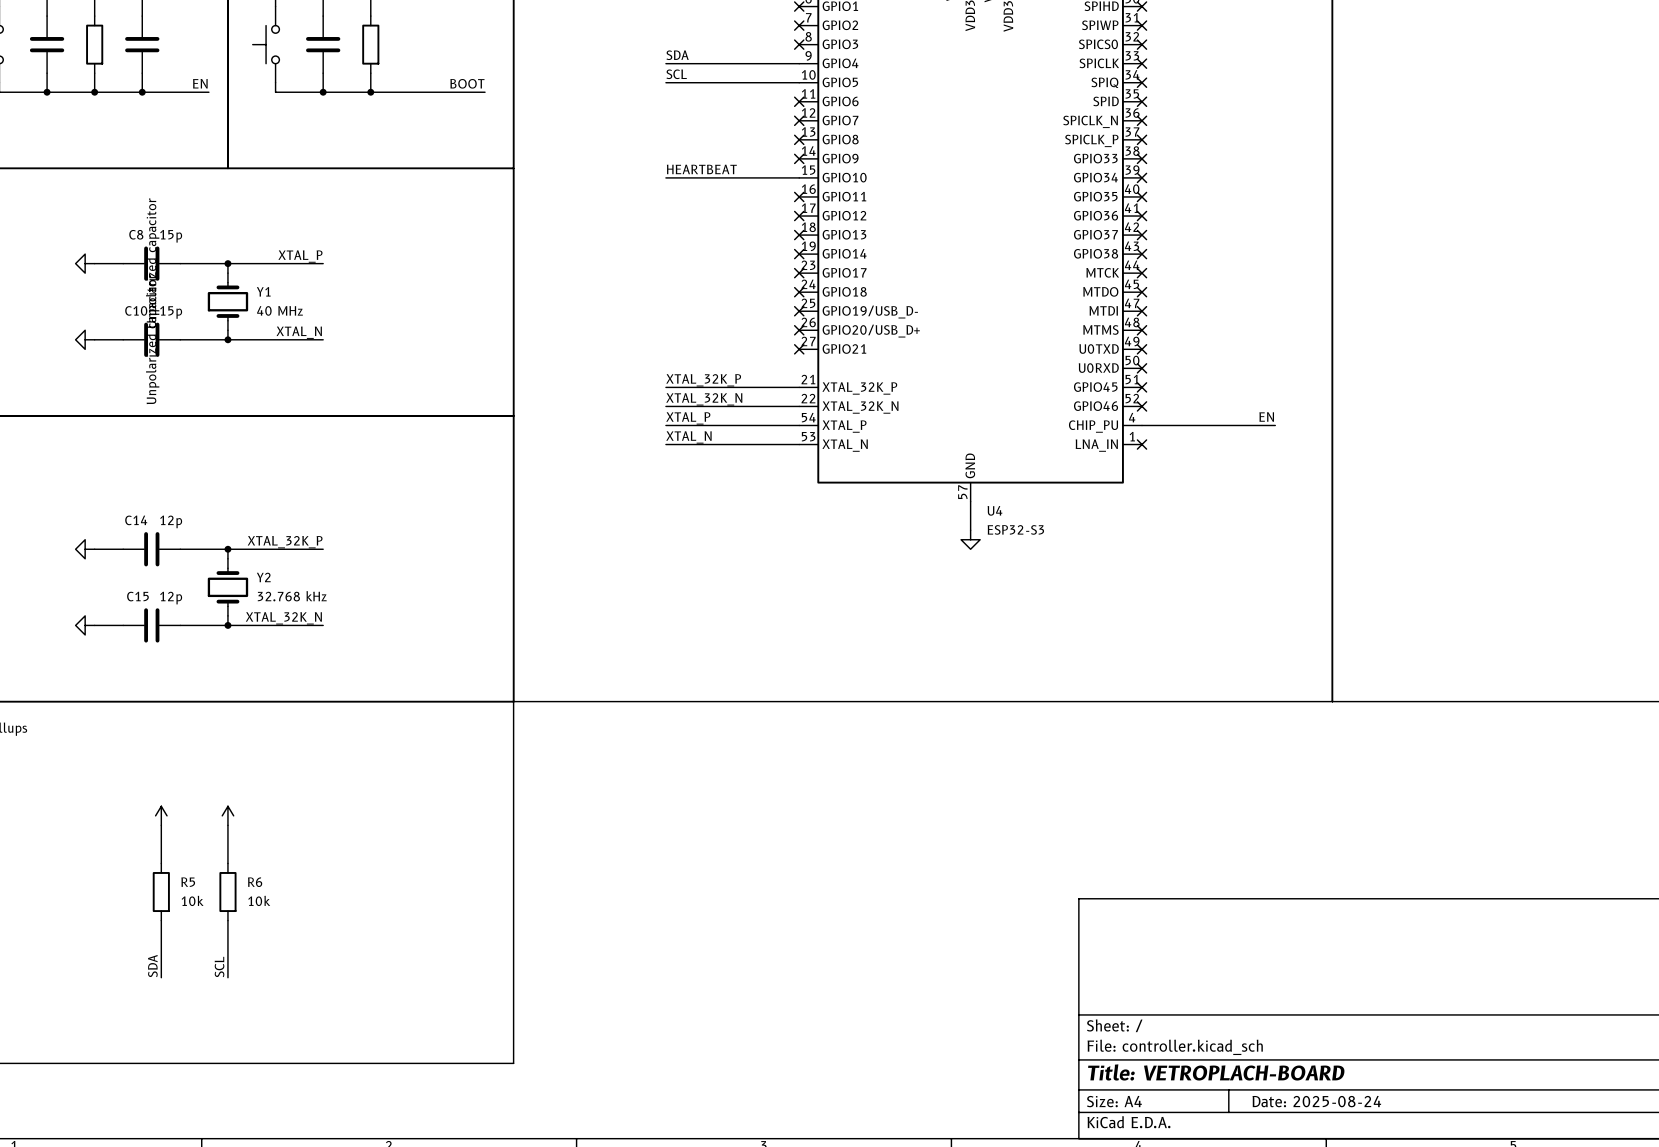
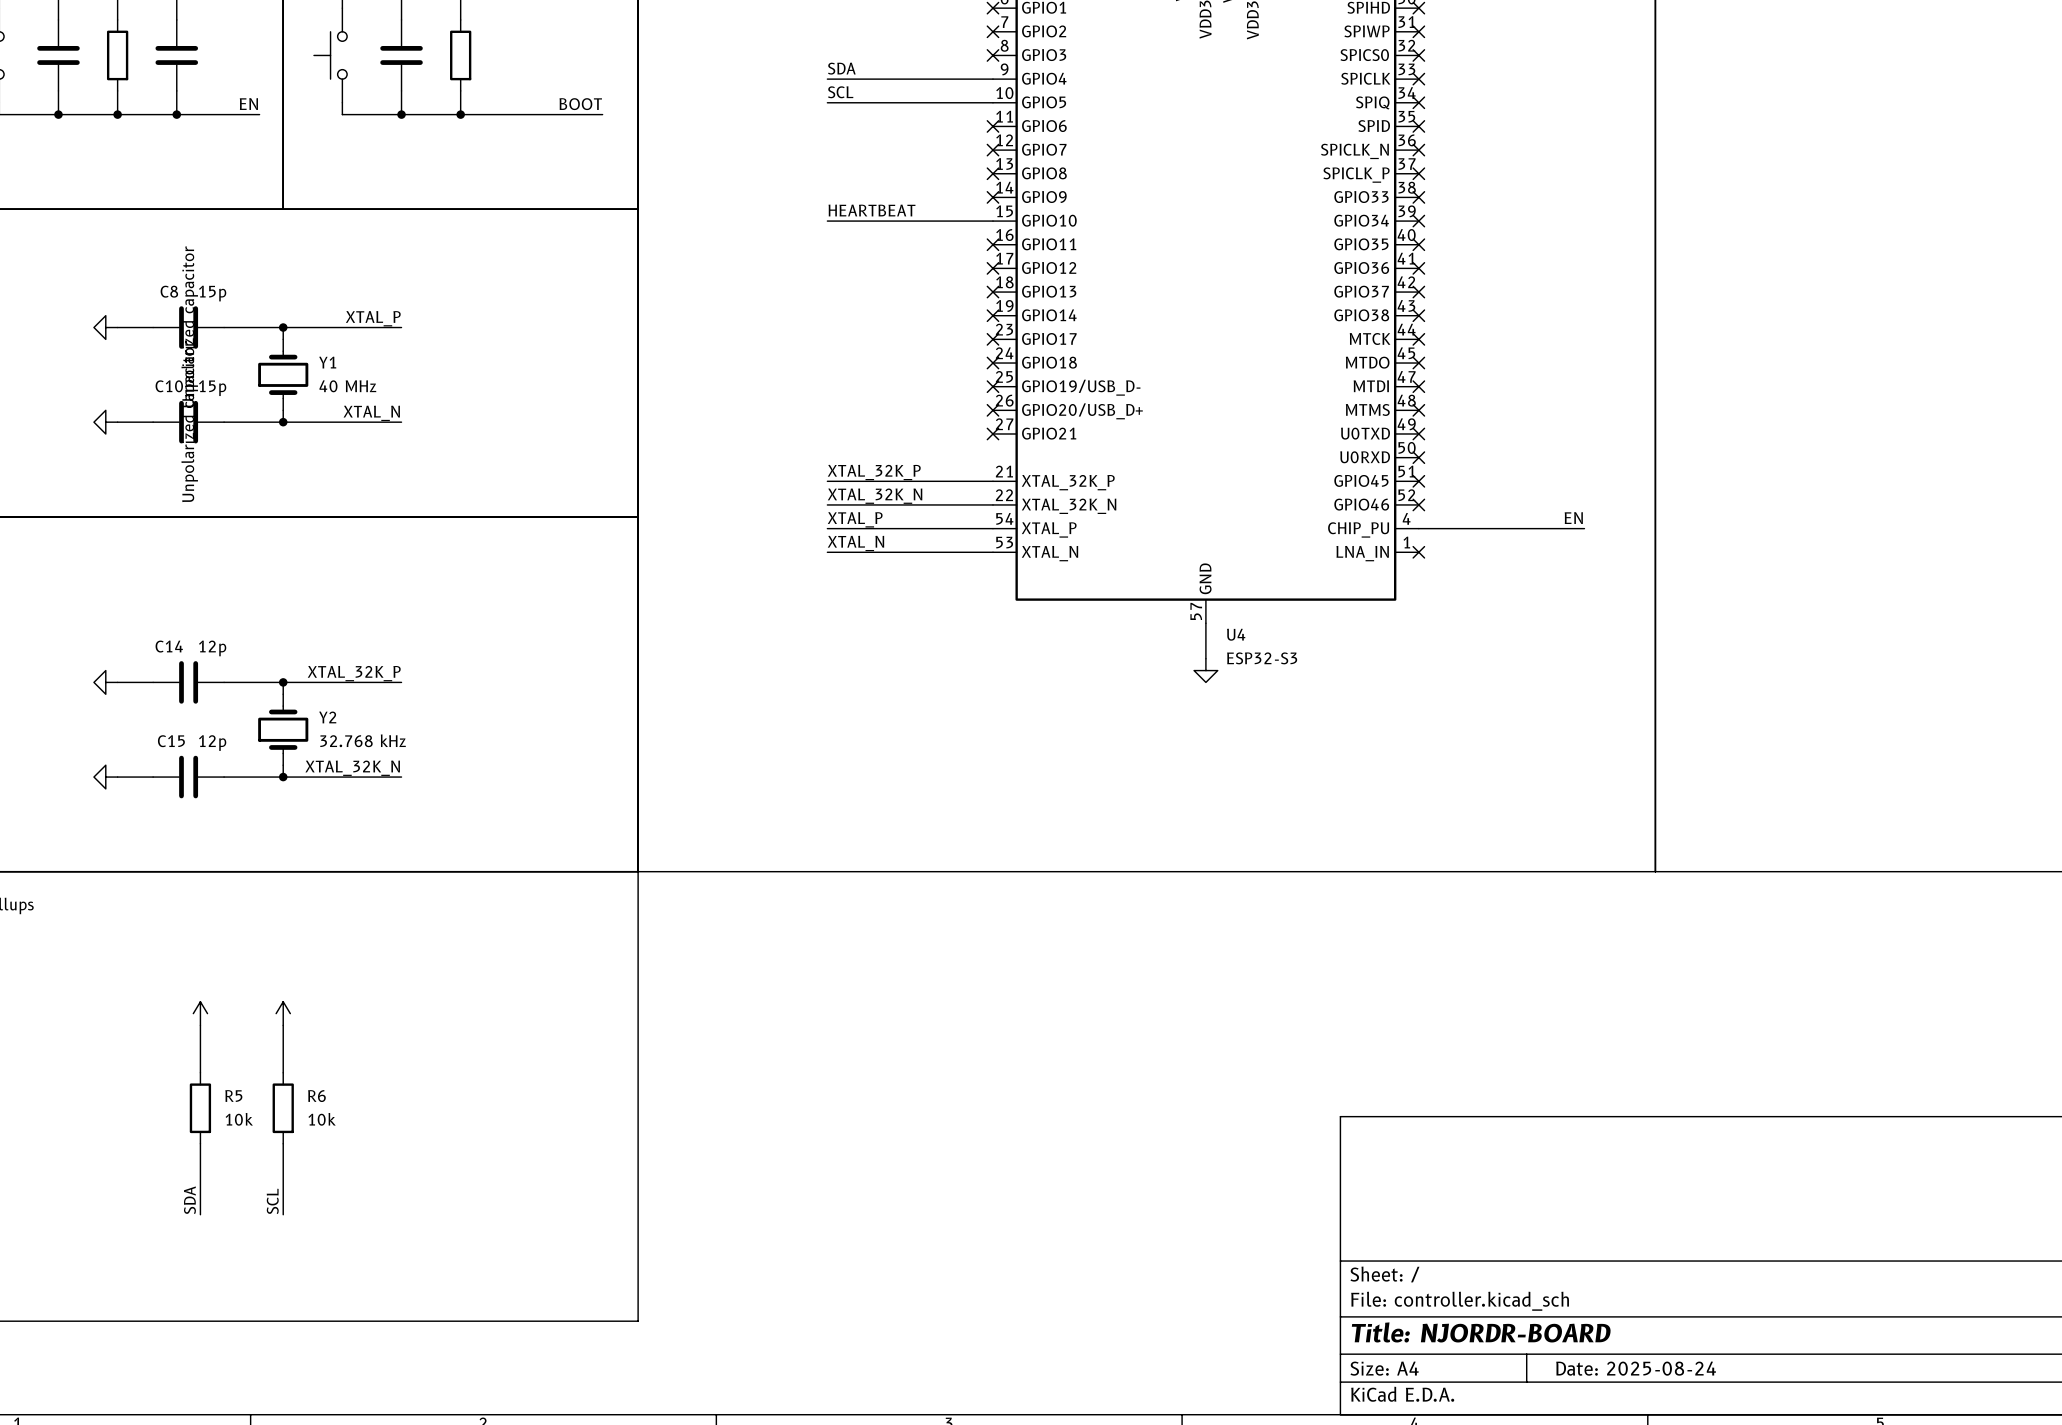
title block: Title: VETROPLACH-BOARD (1216, 1072) -> Title: NJORDR-BOARD (1481, 1332)

